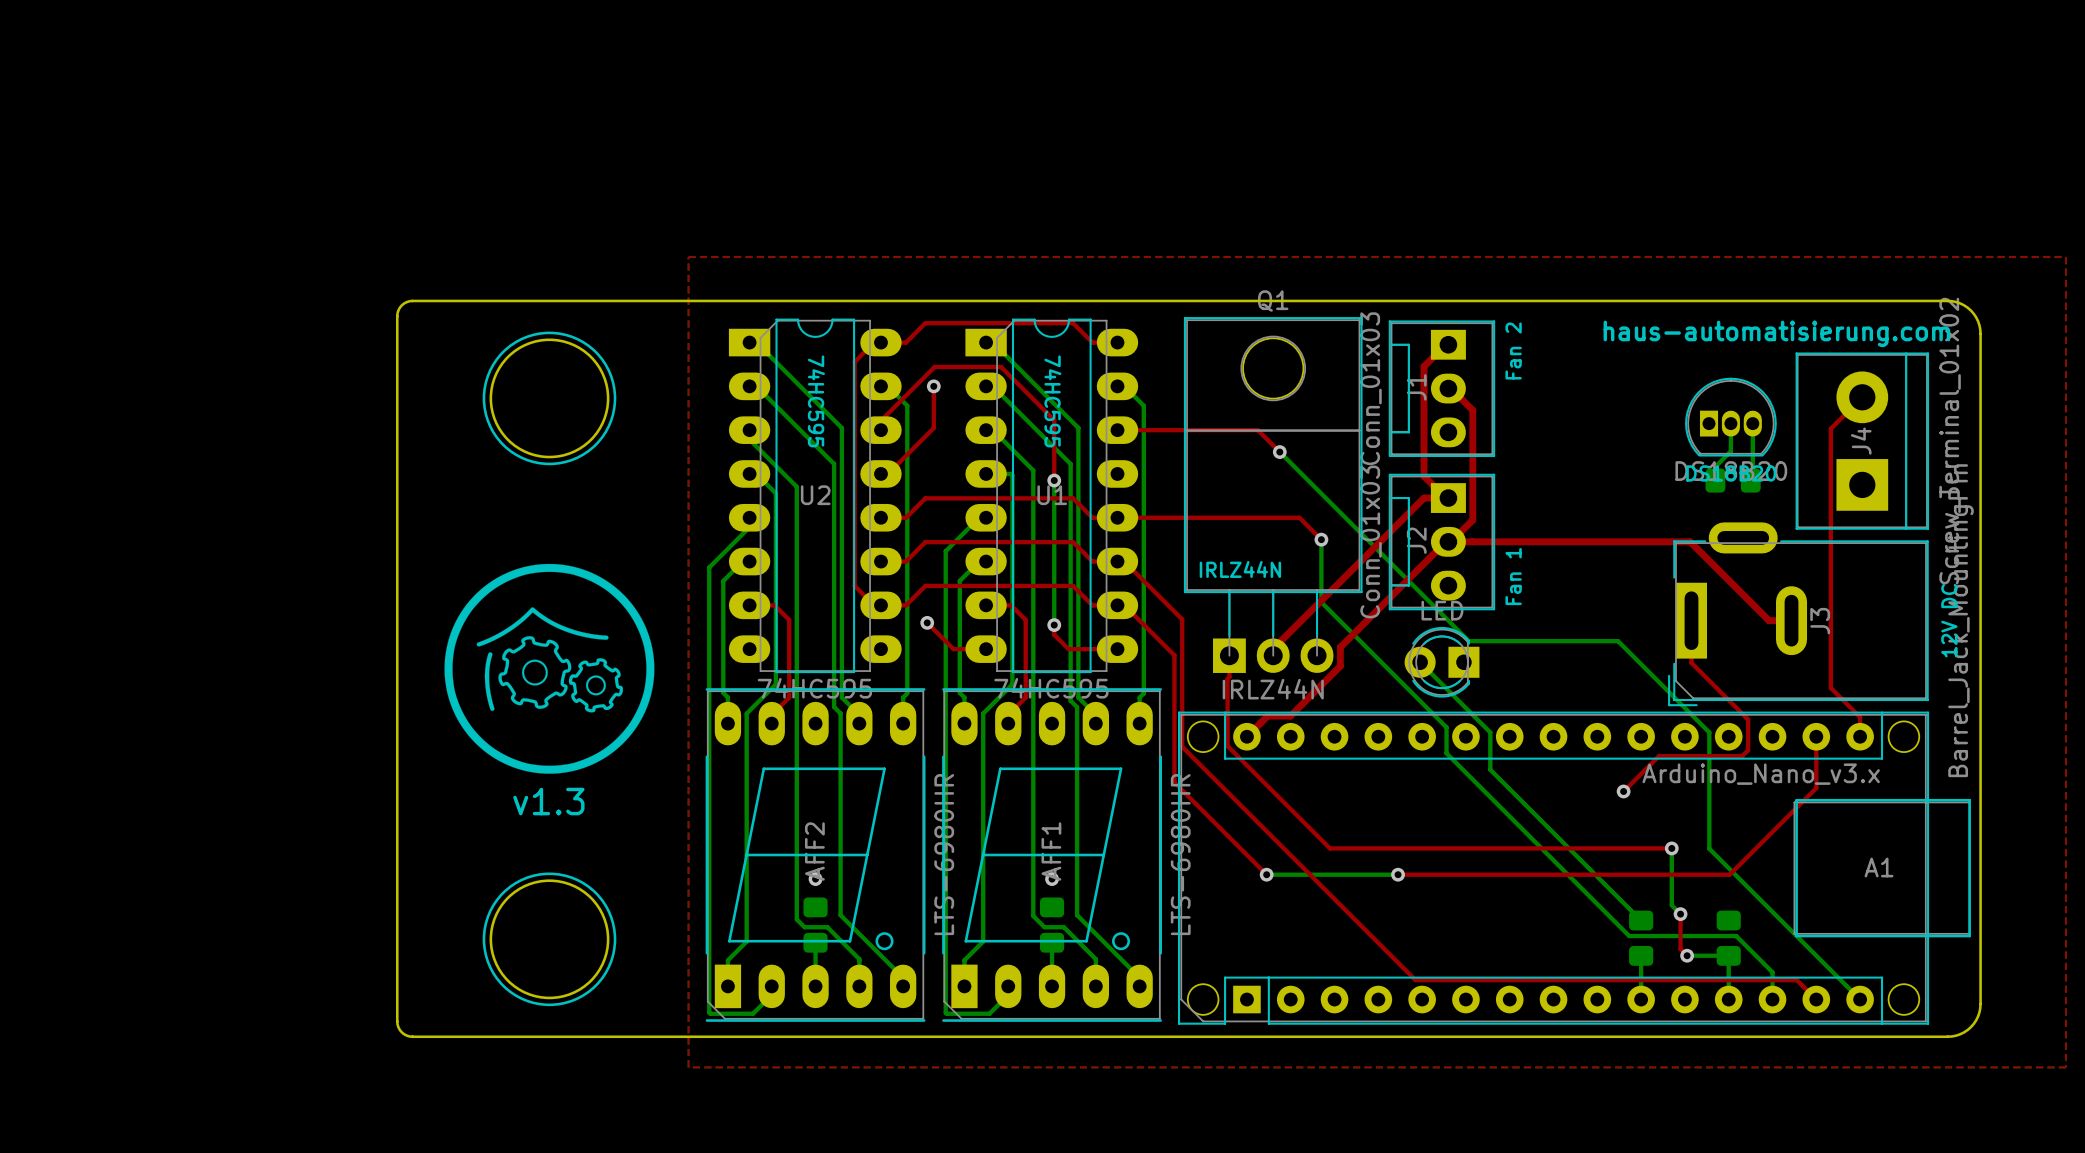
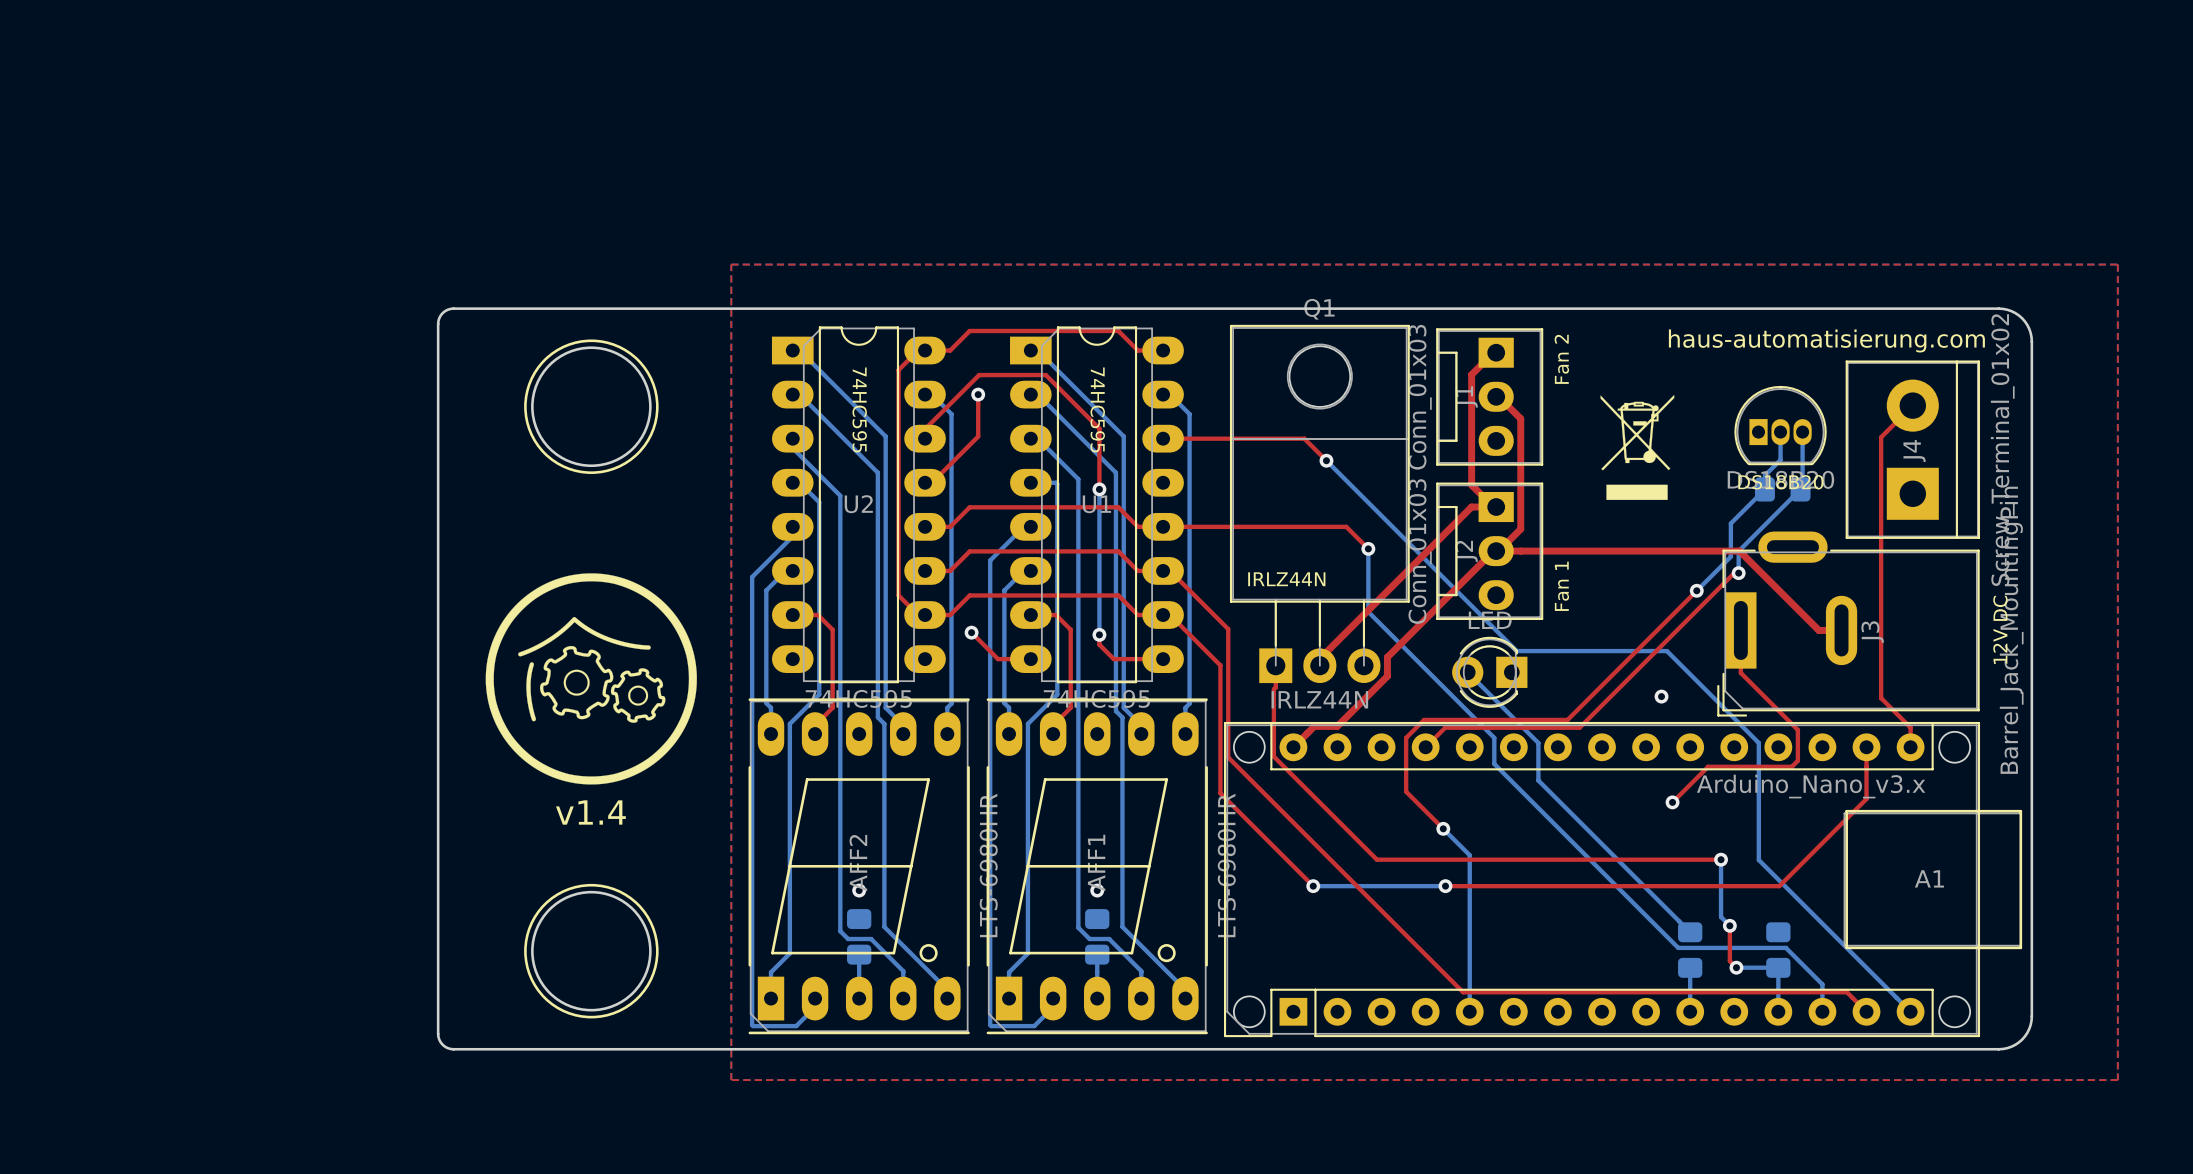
drawing: none -> [1600, 394, 1675, 500]
bottom track: none -> (1764, 489) (1730, 523) (1730, 556) (1696, 590)
bottom track: none -> (1800, 489) (1738, 551) (1738, 573)
top track: none -> (1738, 573) (1734, 573) (1579, 727) (1445, 727) (1425, 747)
via: none -> (1738, 573)
top track: none -> (1696, 590) (1567, 719) (1424, 719) (1406, 737) (1406, 791) (1443, 828)
via: none -> (1696, 590)
via: none -> (1661, 696)
text: v1.3 (548, 801) -> v1.4 (590, 812)
bottom track: none -> (1443, 828) (1469, 855) (1469, 1011)
via: none -> (1443, 828)

